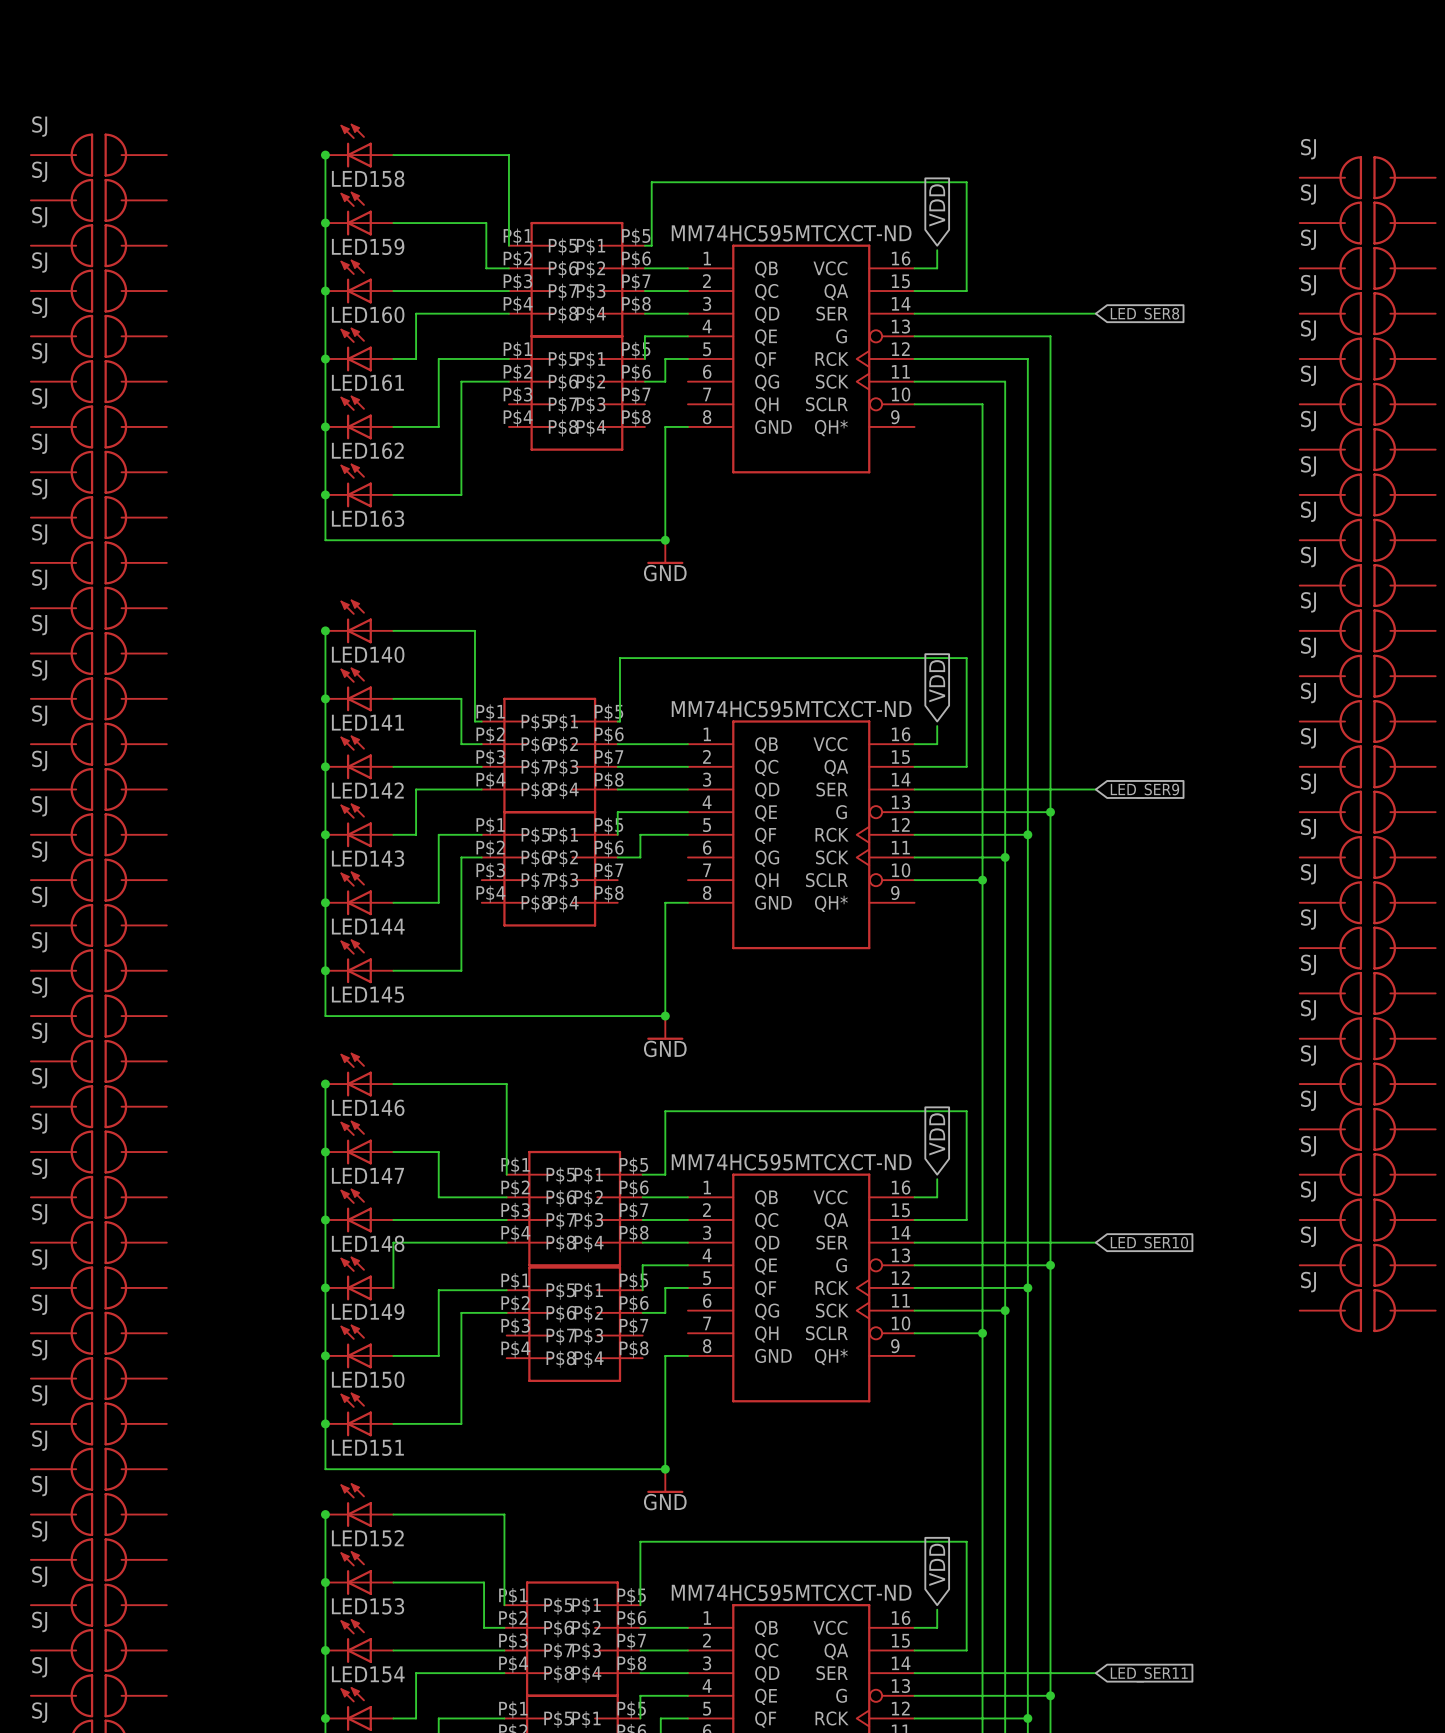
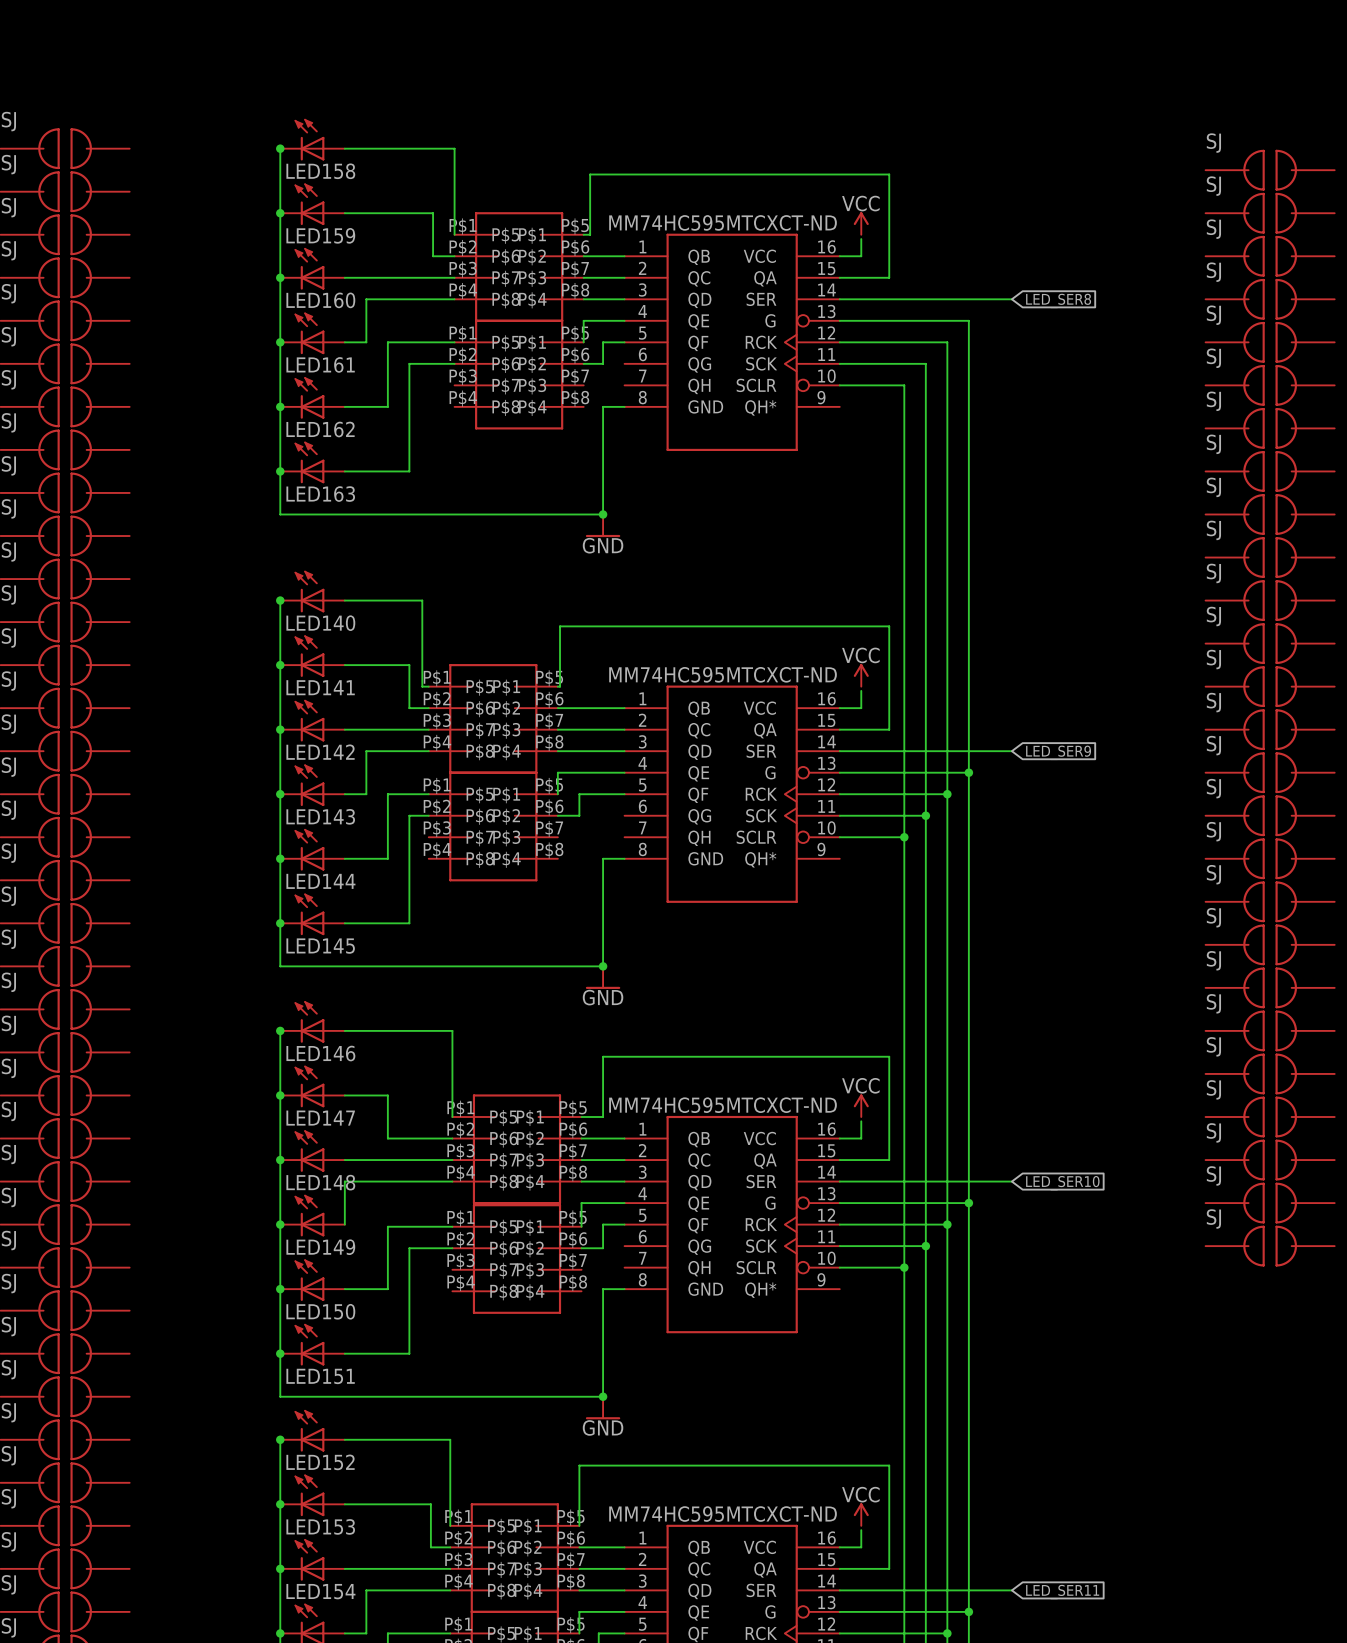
global label: VDD (937, 205) -> none
power symbol: none -> VCC (861, 223)
global label: VDD (937, 681) -> none
power symbol: none -> VCC (861, 675)
global label: VDD (937, 1134) -> none
power symbol: none -> VCC (861, 1105)
global label: VDD (937, 1564) -> none
power symbol: none -> VCC (861, 1514)

